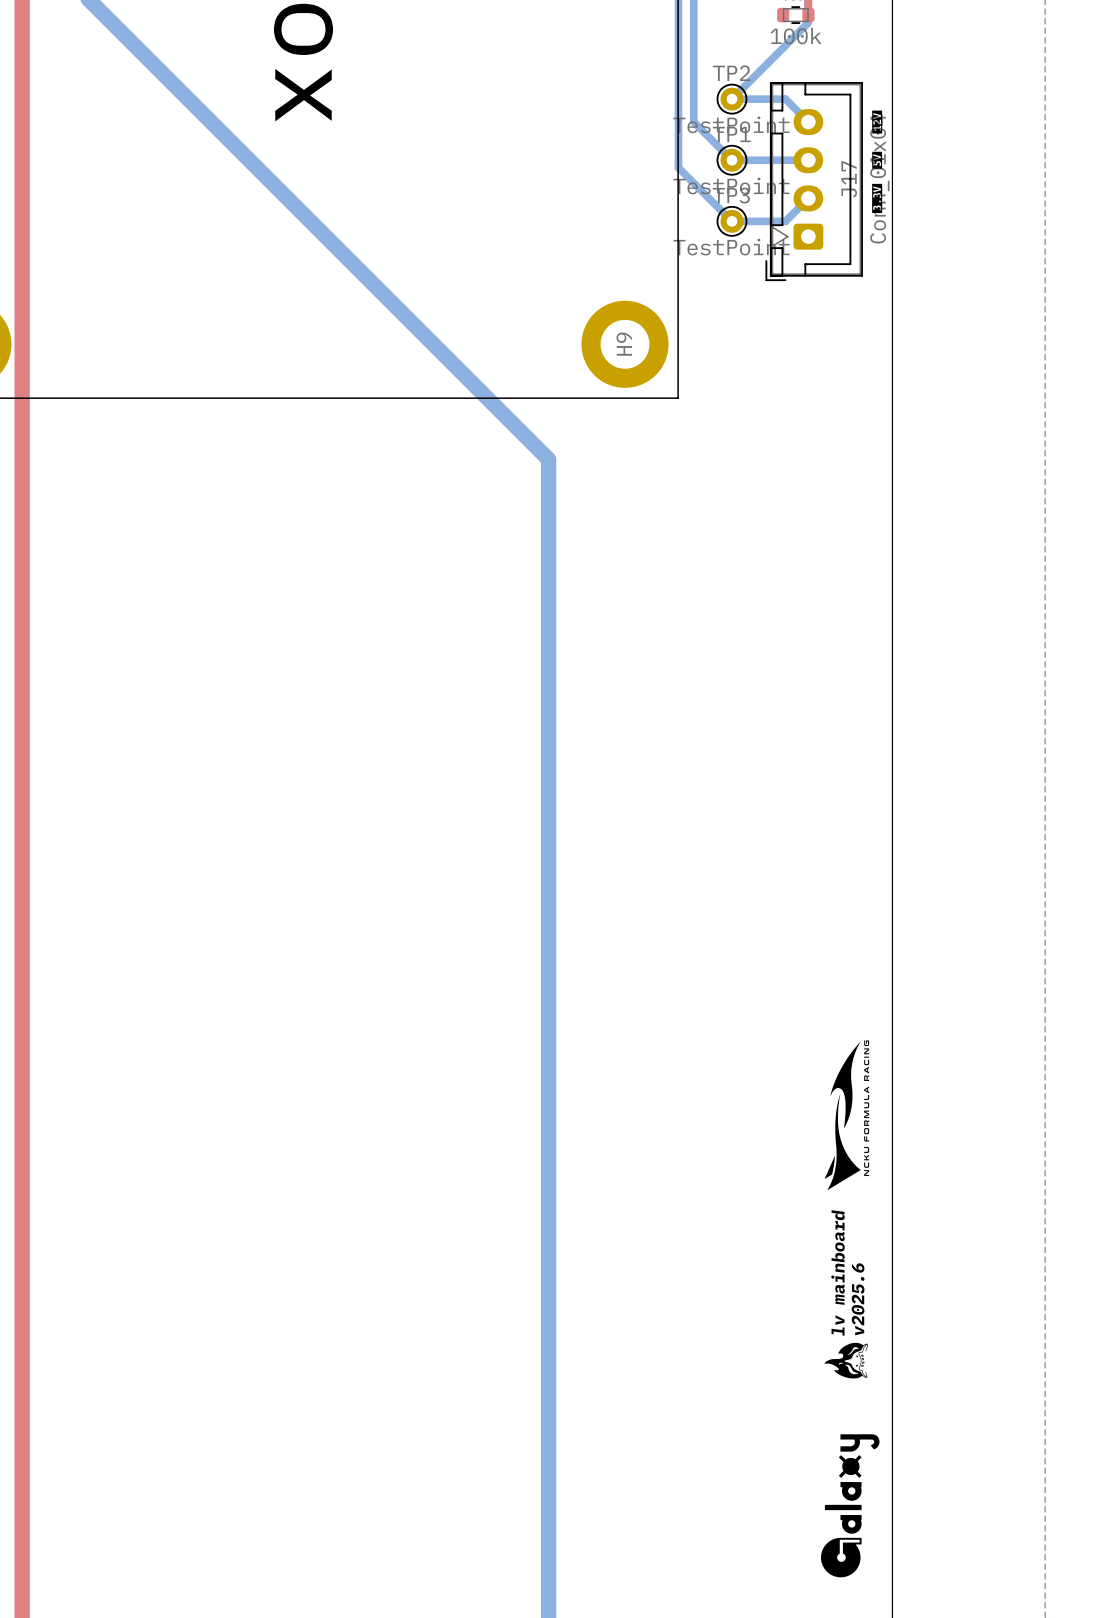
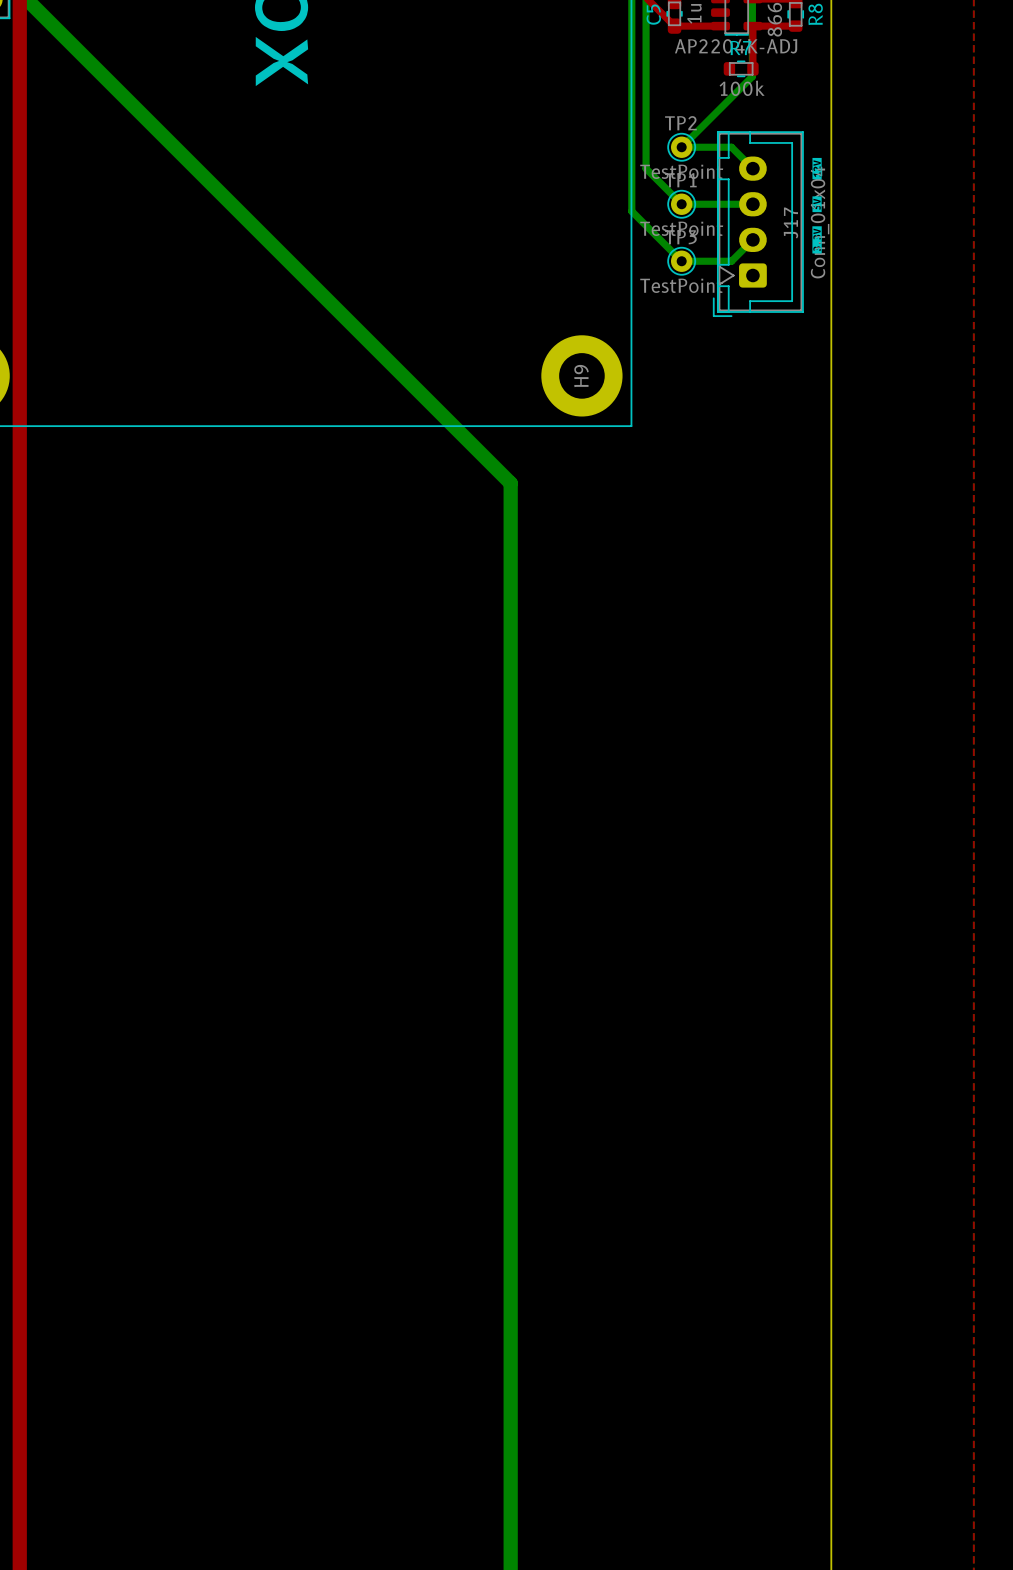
drawing: [824, 1040, 870, 1191] -> none
text: lv mainboard (838, 1272) -> none
text: v2025.6 (858, 1299) -> none
drawing: [824, 1342, 868, 1379] -> none
drawing: [821, 1434, 880, 1578] -> none

